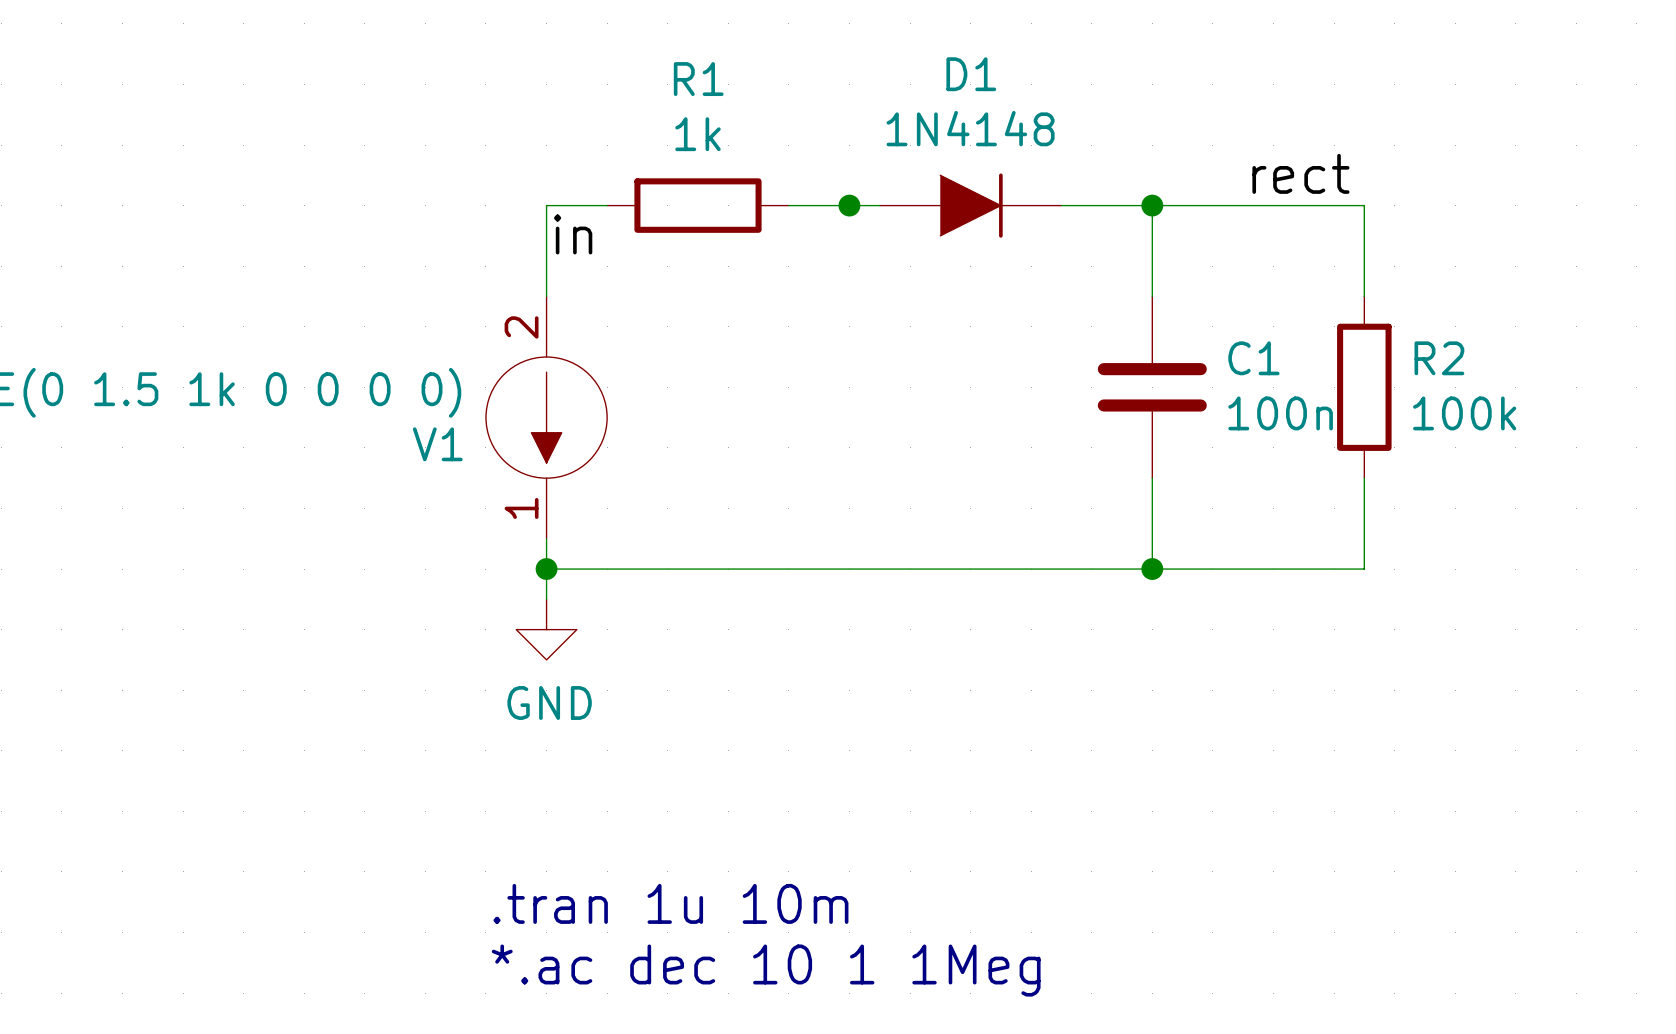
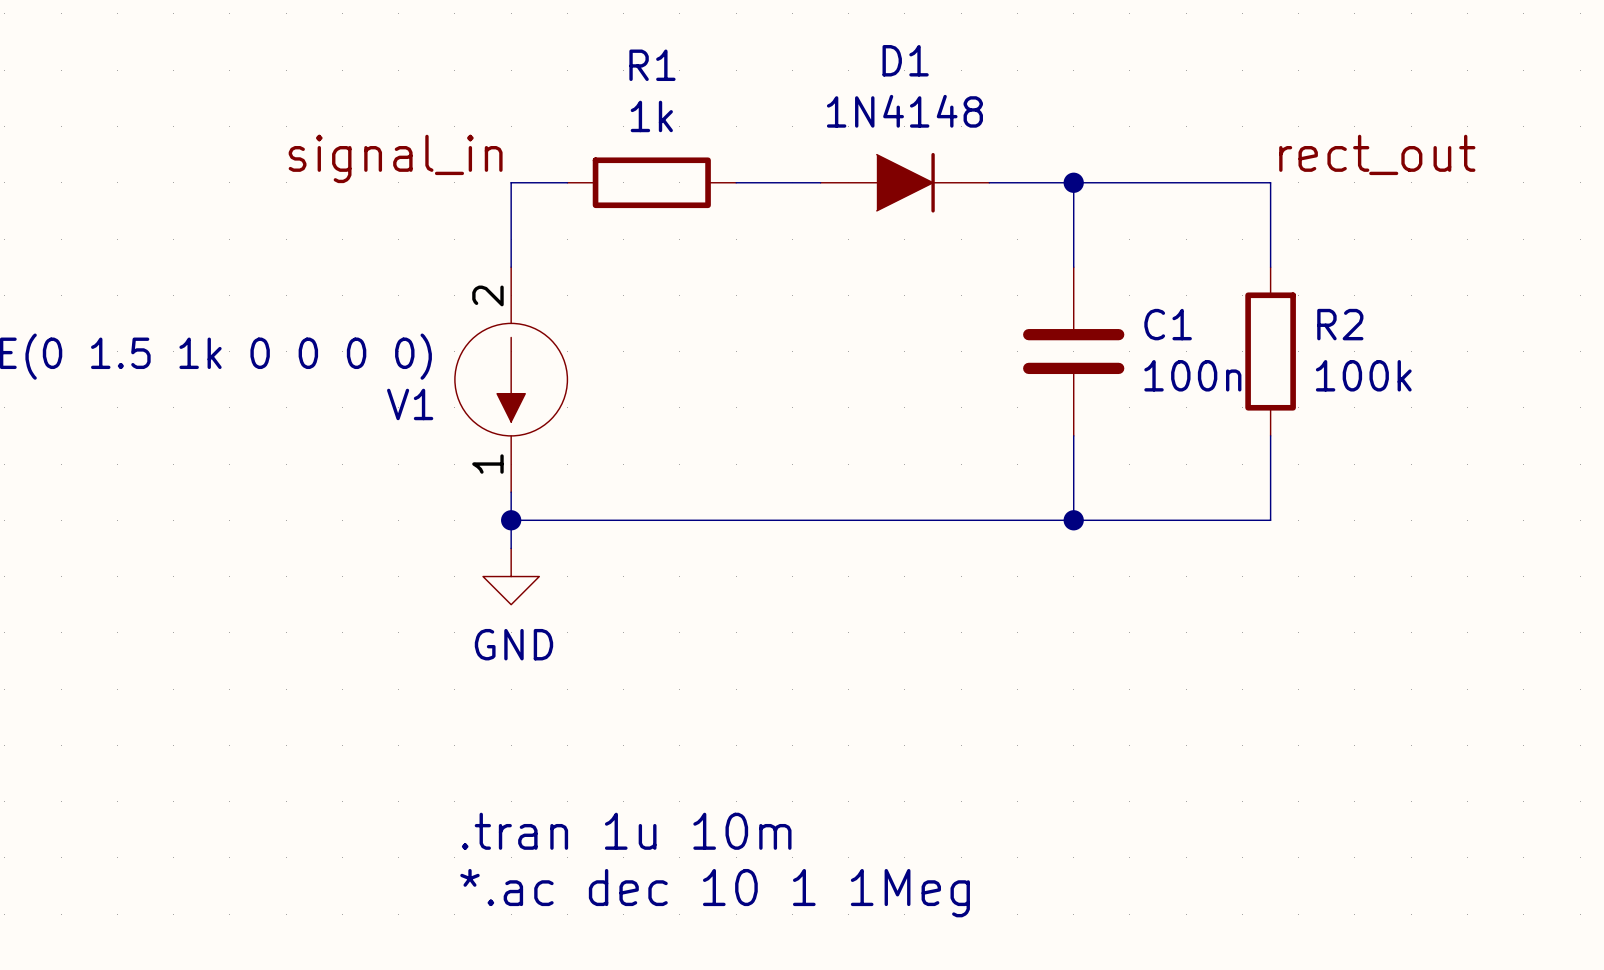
label: rect (1300, 173) -> rect_out (1377, 154)
label: none -> signal_in (395, 158)
junction: (849, 205) -> none
label: in (573, 234) -> none

